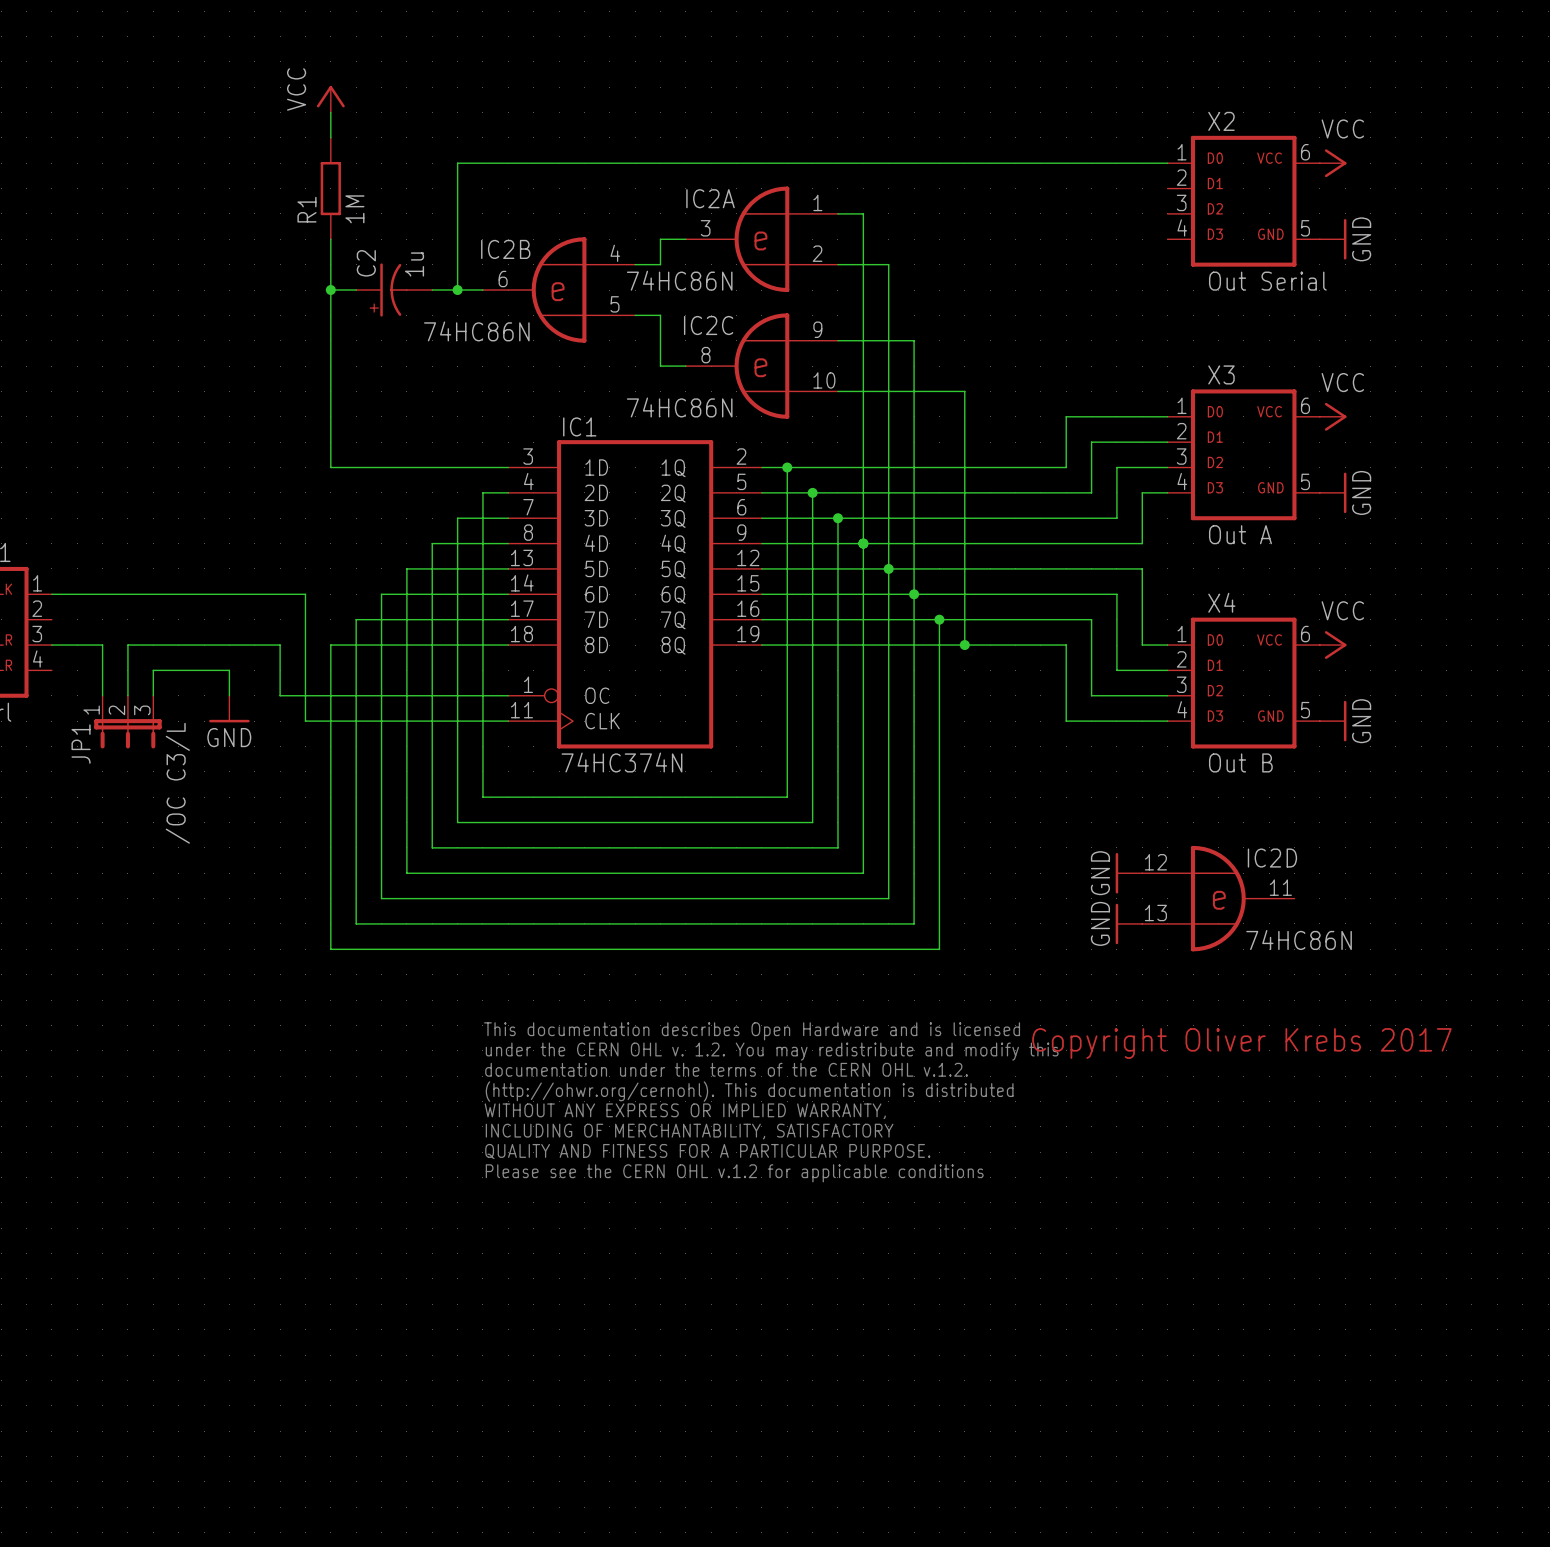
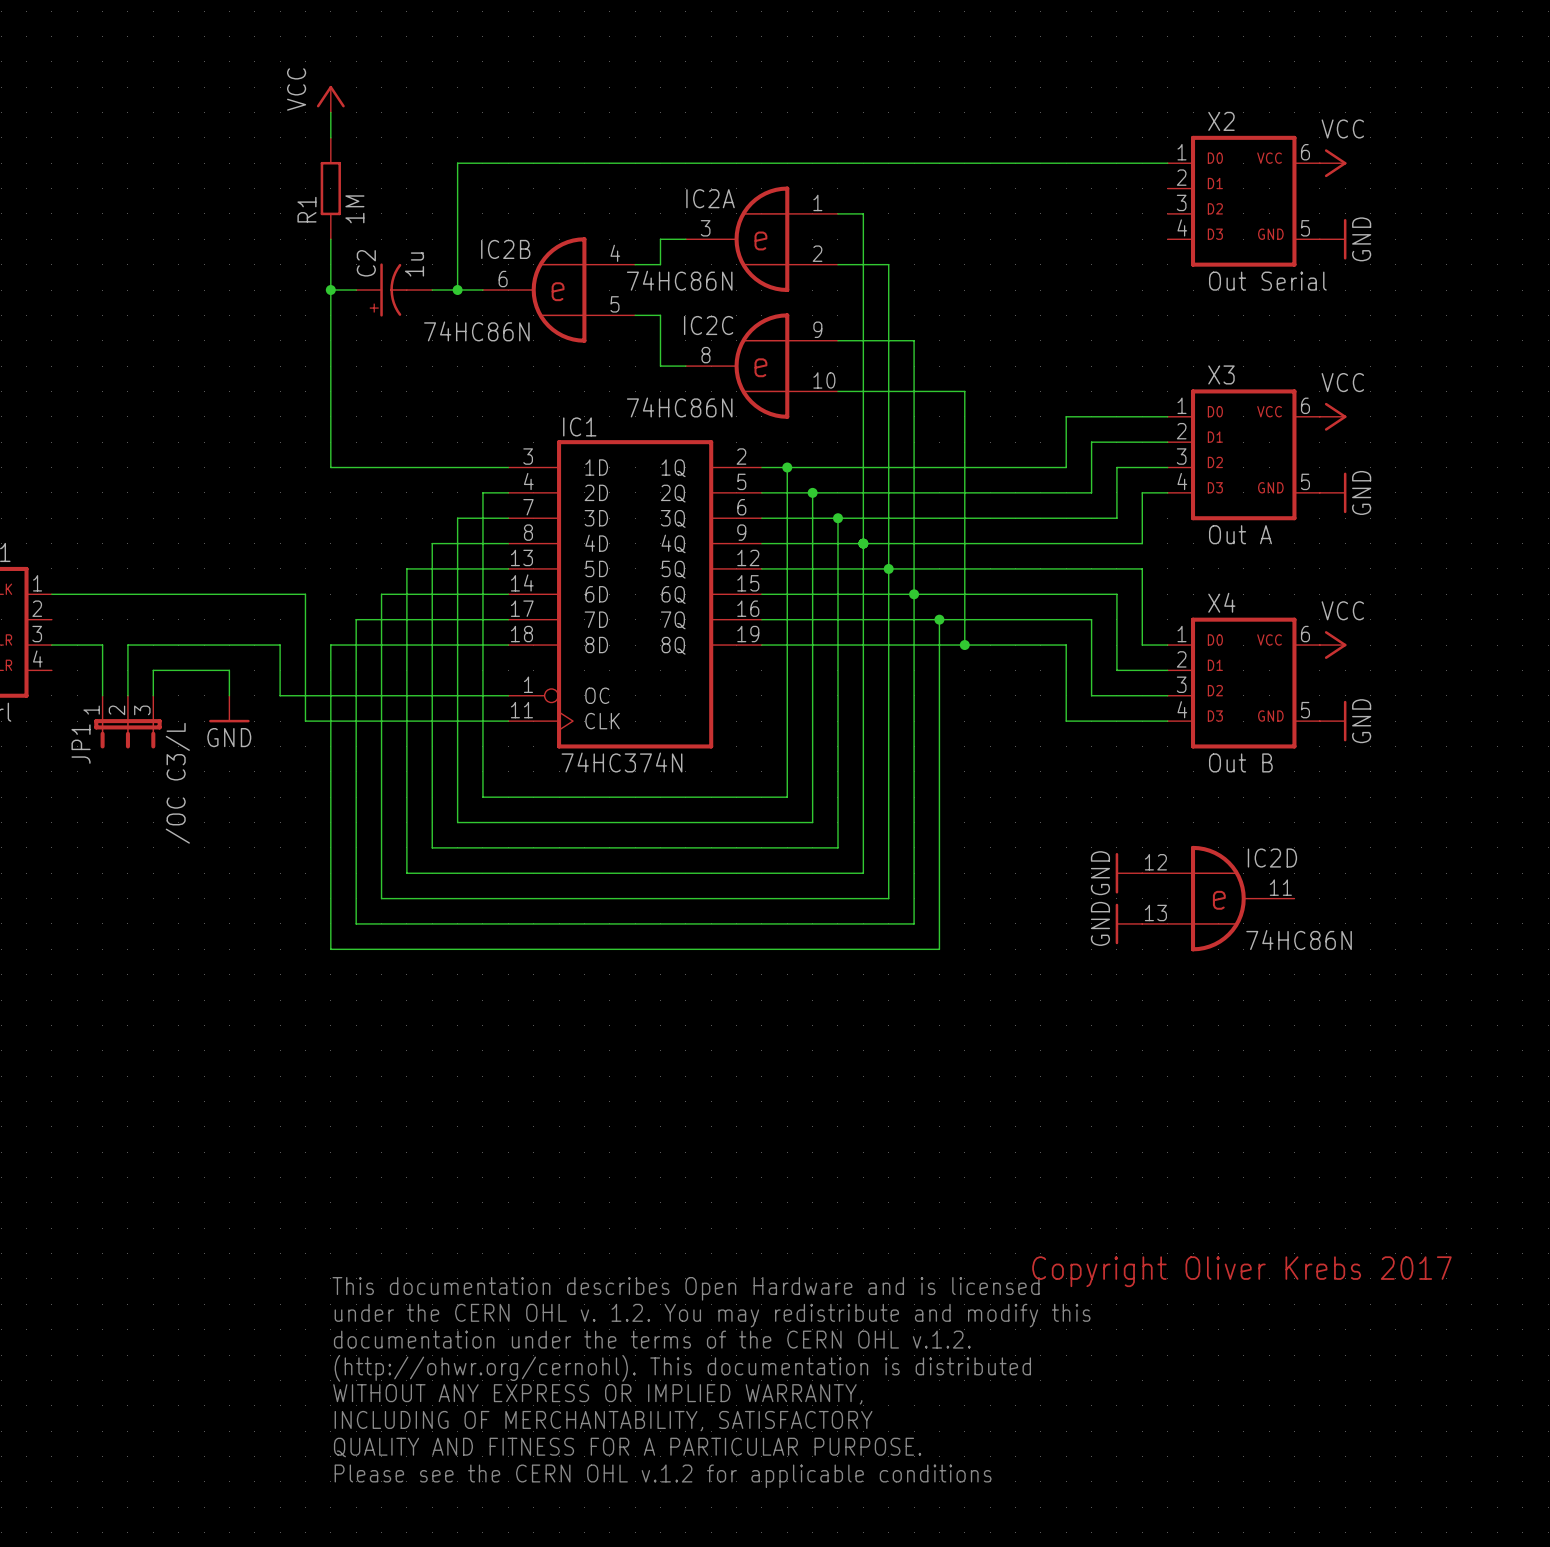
text: This documentation describes Open Hardware and is licensed (752, 1031) -> none
text position: Copyright Oliver Krebs 2017 (1241, 1043) -> Copyright Oliver Krebs 2017 (1241, 1271)
text: under the CERN OHL v. 1.2. You may redistribute and modify this (772, 1051) -> none
text: documentation under the terms of the CERN OHL v.1.2. (726, 1069) -> none
text: (http://ohwr.org/cernohl). This documentation is distributed (749, 1091) -> none
text: WITHOUT ANY EXPRESS OR IMPLIED WARRANTY, (685, 1111) -> none
text: INCLUDING OF MERCHANTABILITY, SATISFACTORY (689, 1131) -> none
text: QUALITY AND FITNESS FOR A PARTICULAR PURPOSE. (707, 1151) -> none
text: Please see the CERN OHL v.1.2 for applicable conditions (734, 1173) -> none
text: none -> This documentation describes Open Hardware and is licensed (686, 1288)
text: none -> under the CERN OHL v. 1.2. You may redistribute and modify this (712, 1315)
text: none -> documentation under the terms of the CERN OHL v.1.2. (652, 1339)
text: none -> (http://ohwr.org/cernohl). This documentation is distributed (682, 1368)
text: none -> WITHOUT ANY EXPRESS OR IMPLIED WARRANTY, (597, 1394)
text: none -> INCLUDING OF MERCHANTABILITY, SATISFACTORY (603, 1421)
text: none -> QUALITY AND FITNESS FOR A PARTICULAR PURPOSE. (627, 1447)
text: none -> Please see the CERN OHL v.1.2 for applicable conditions (663, 1476)

